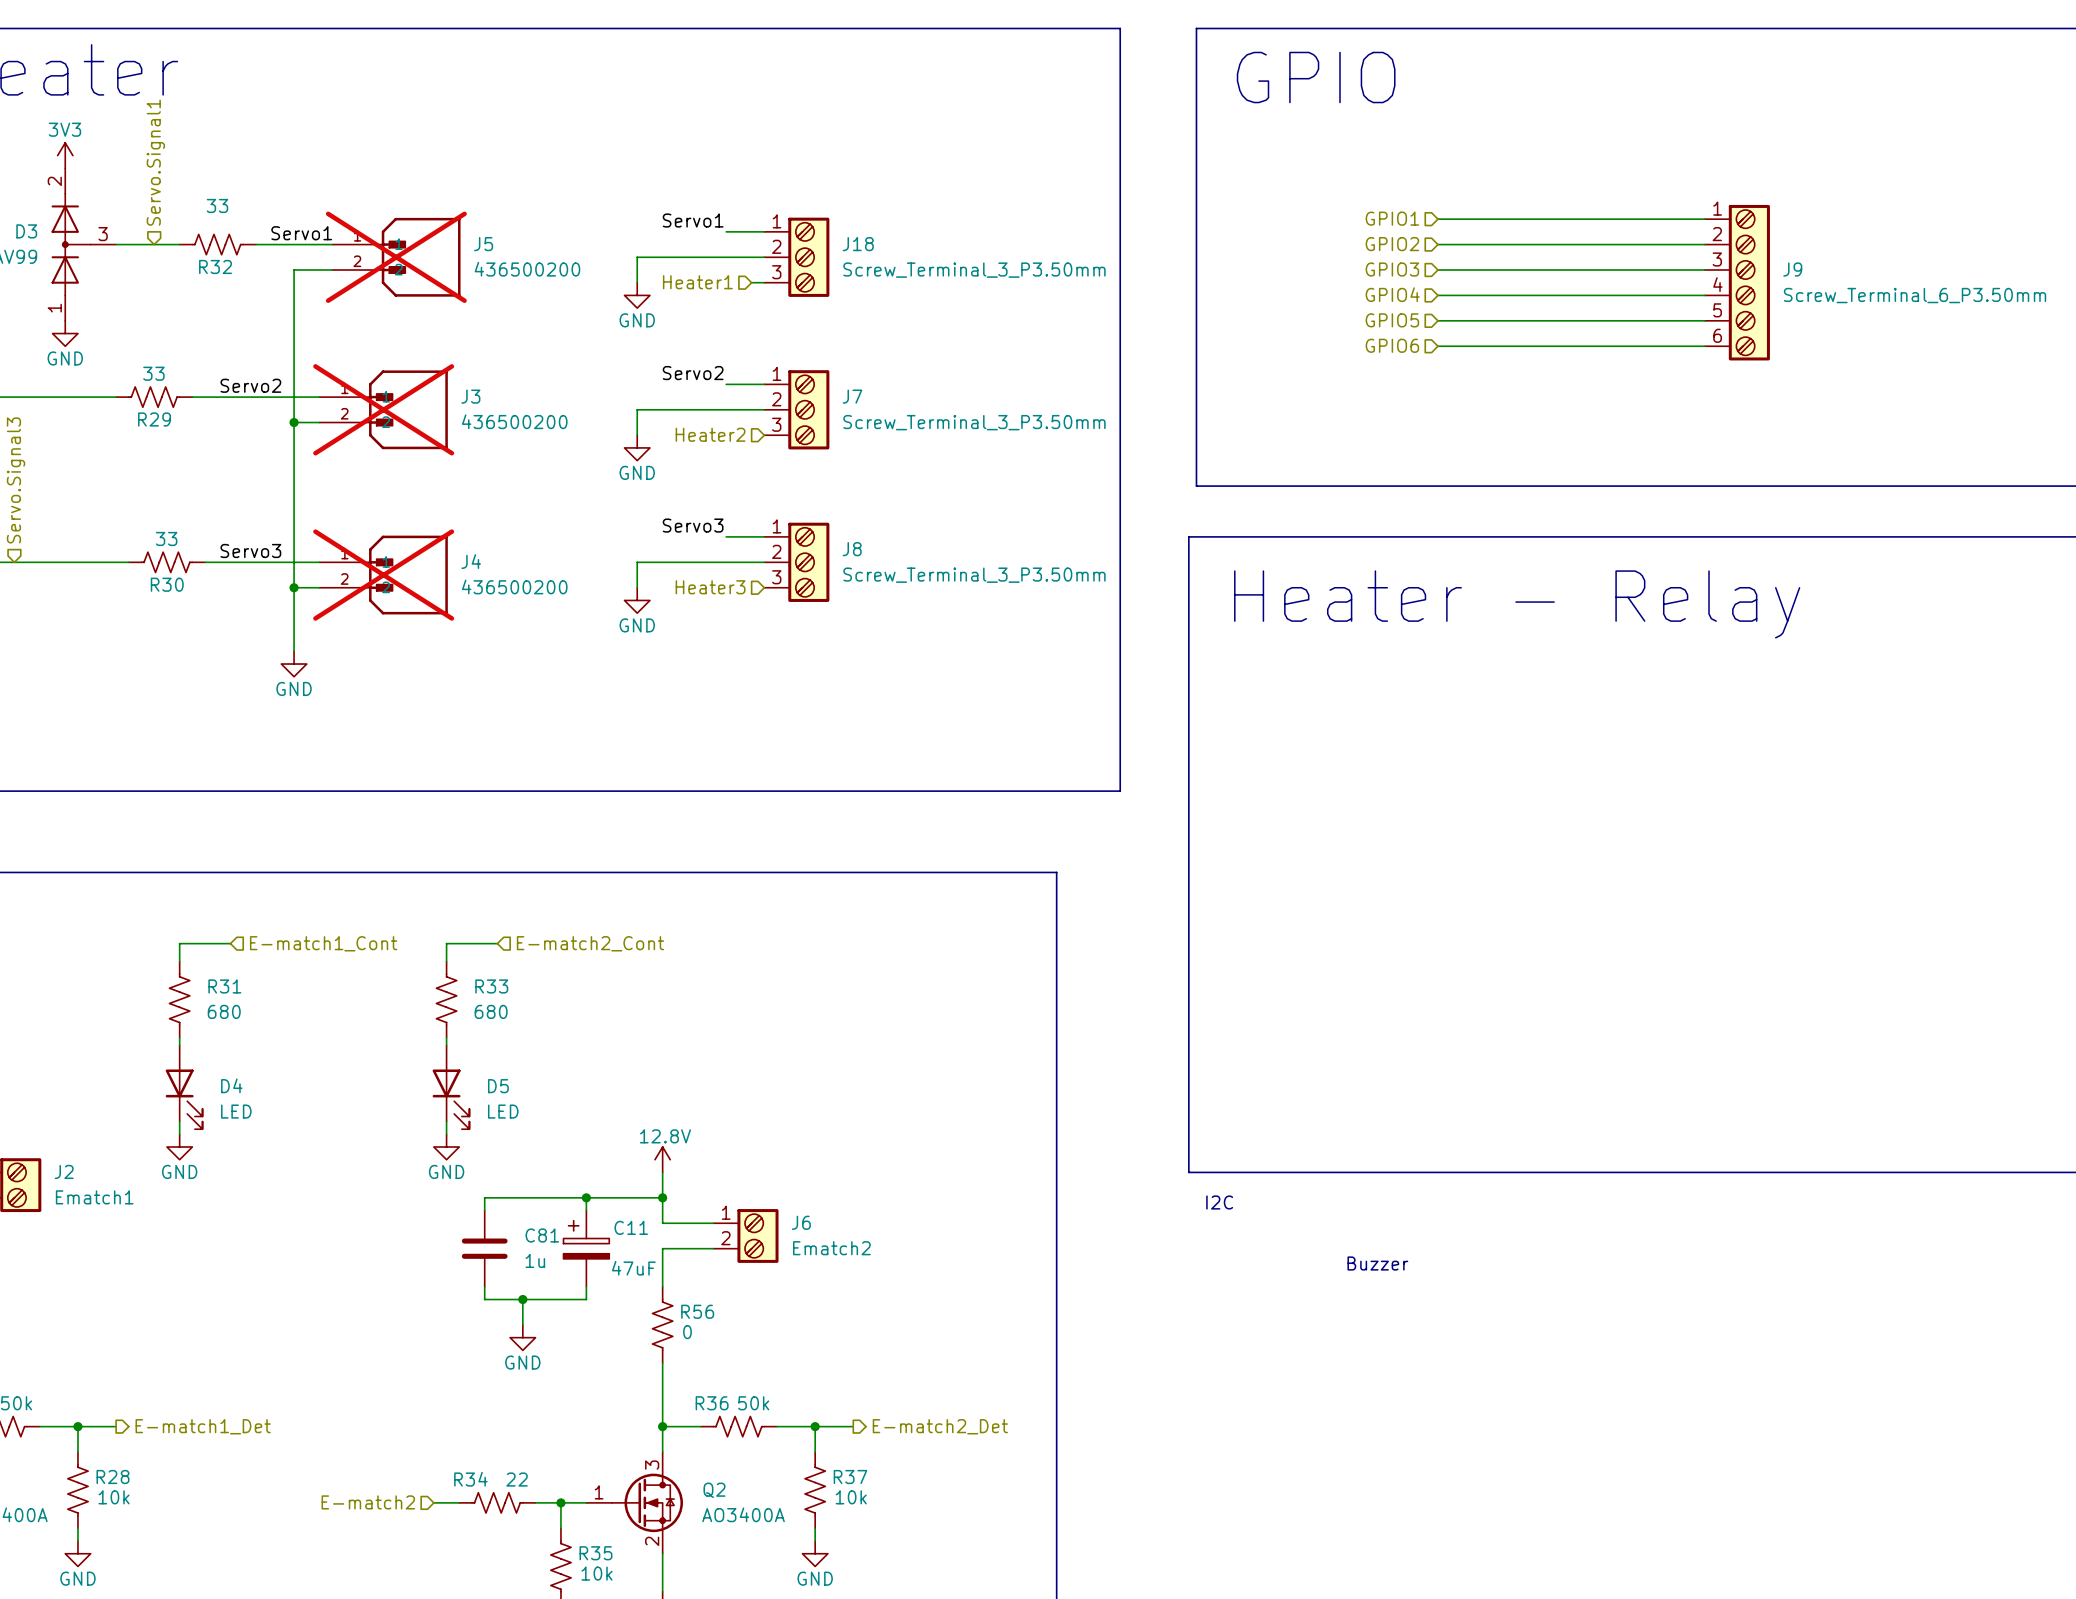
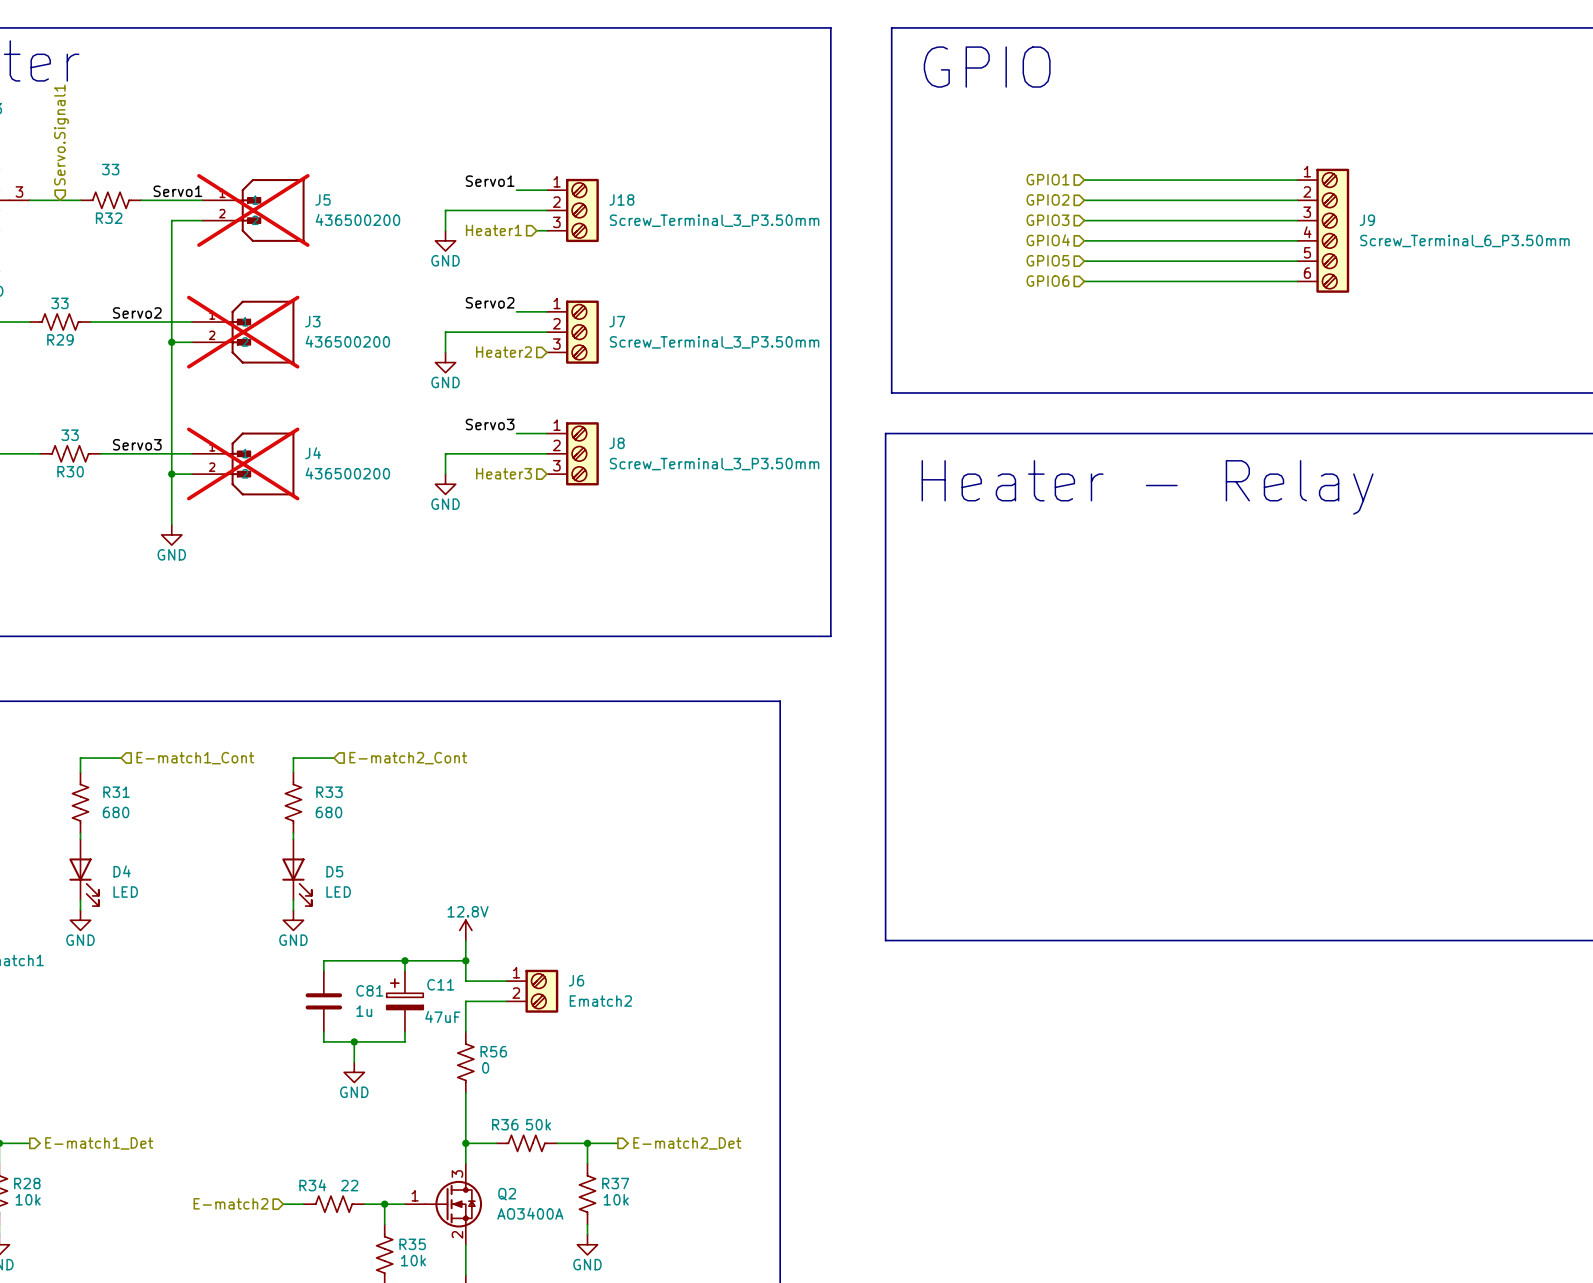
text: I2C (1219, 1202) -> none
text: Buzzer (1377, 1263) -> none

